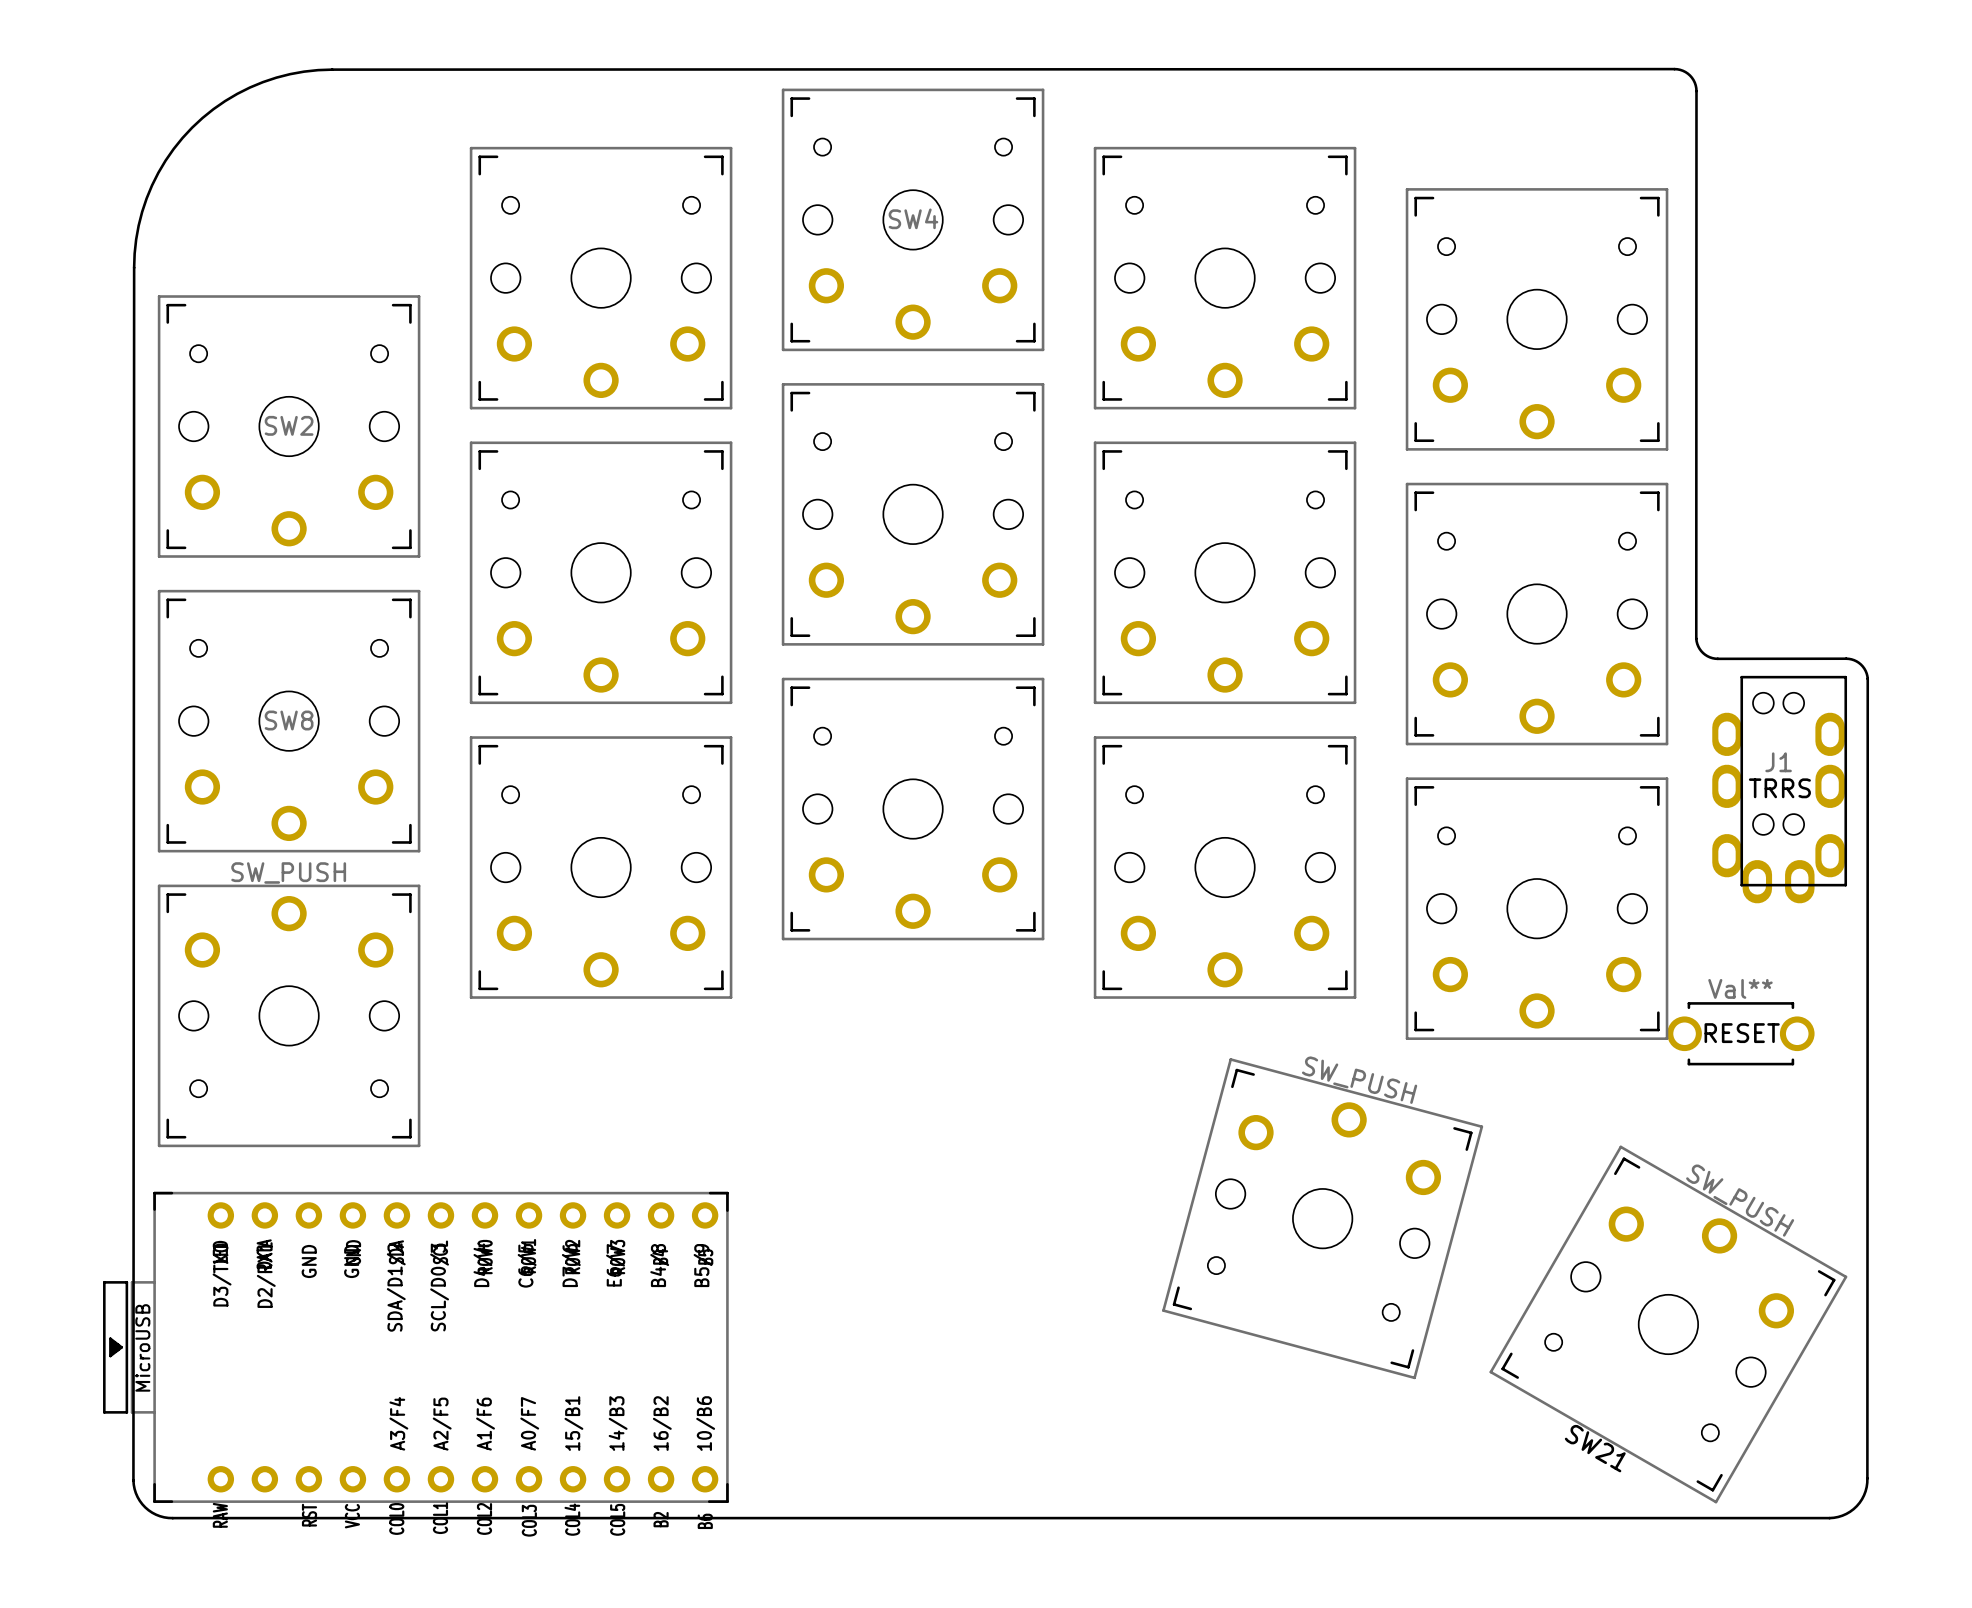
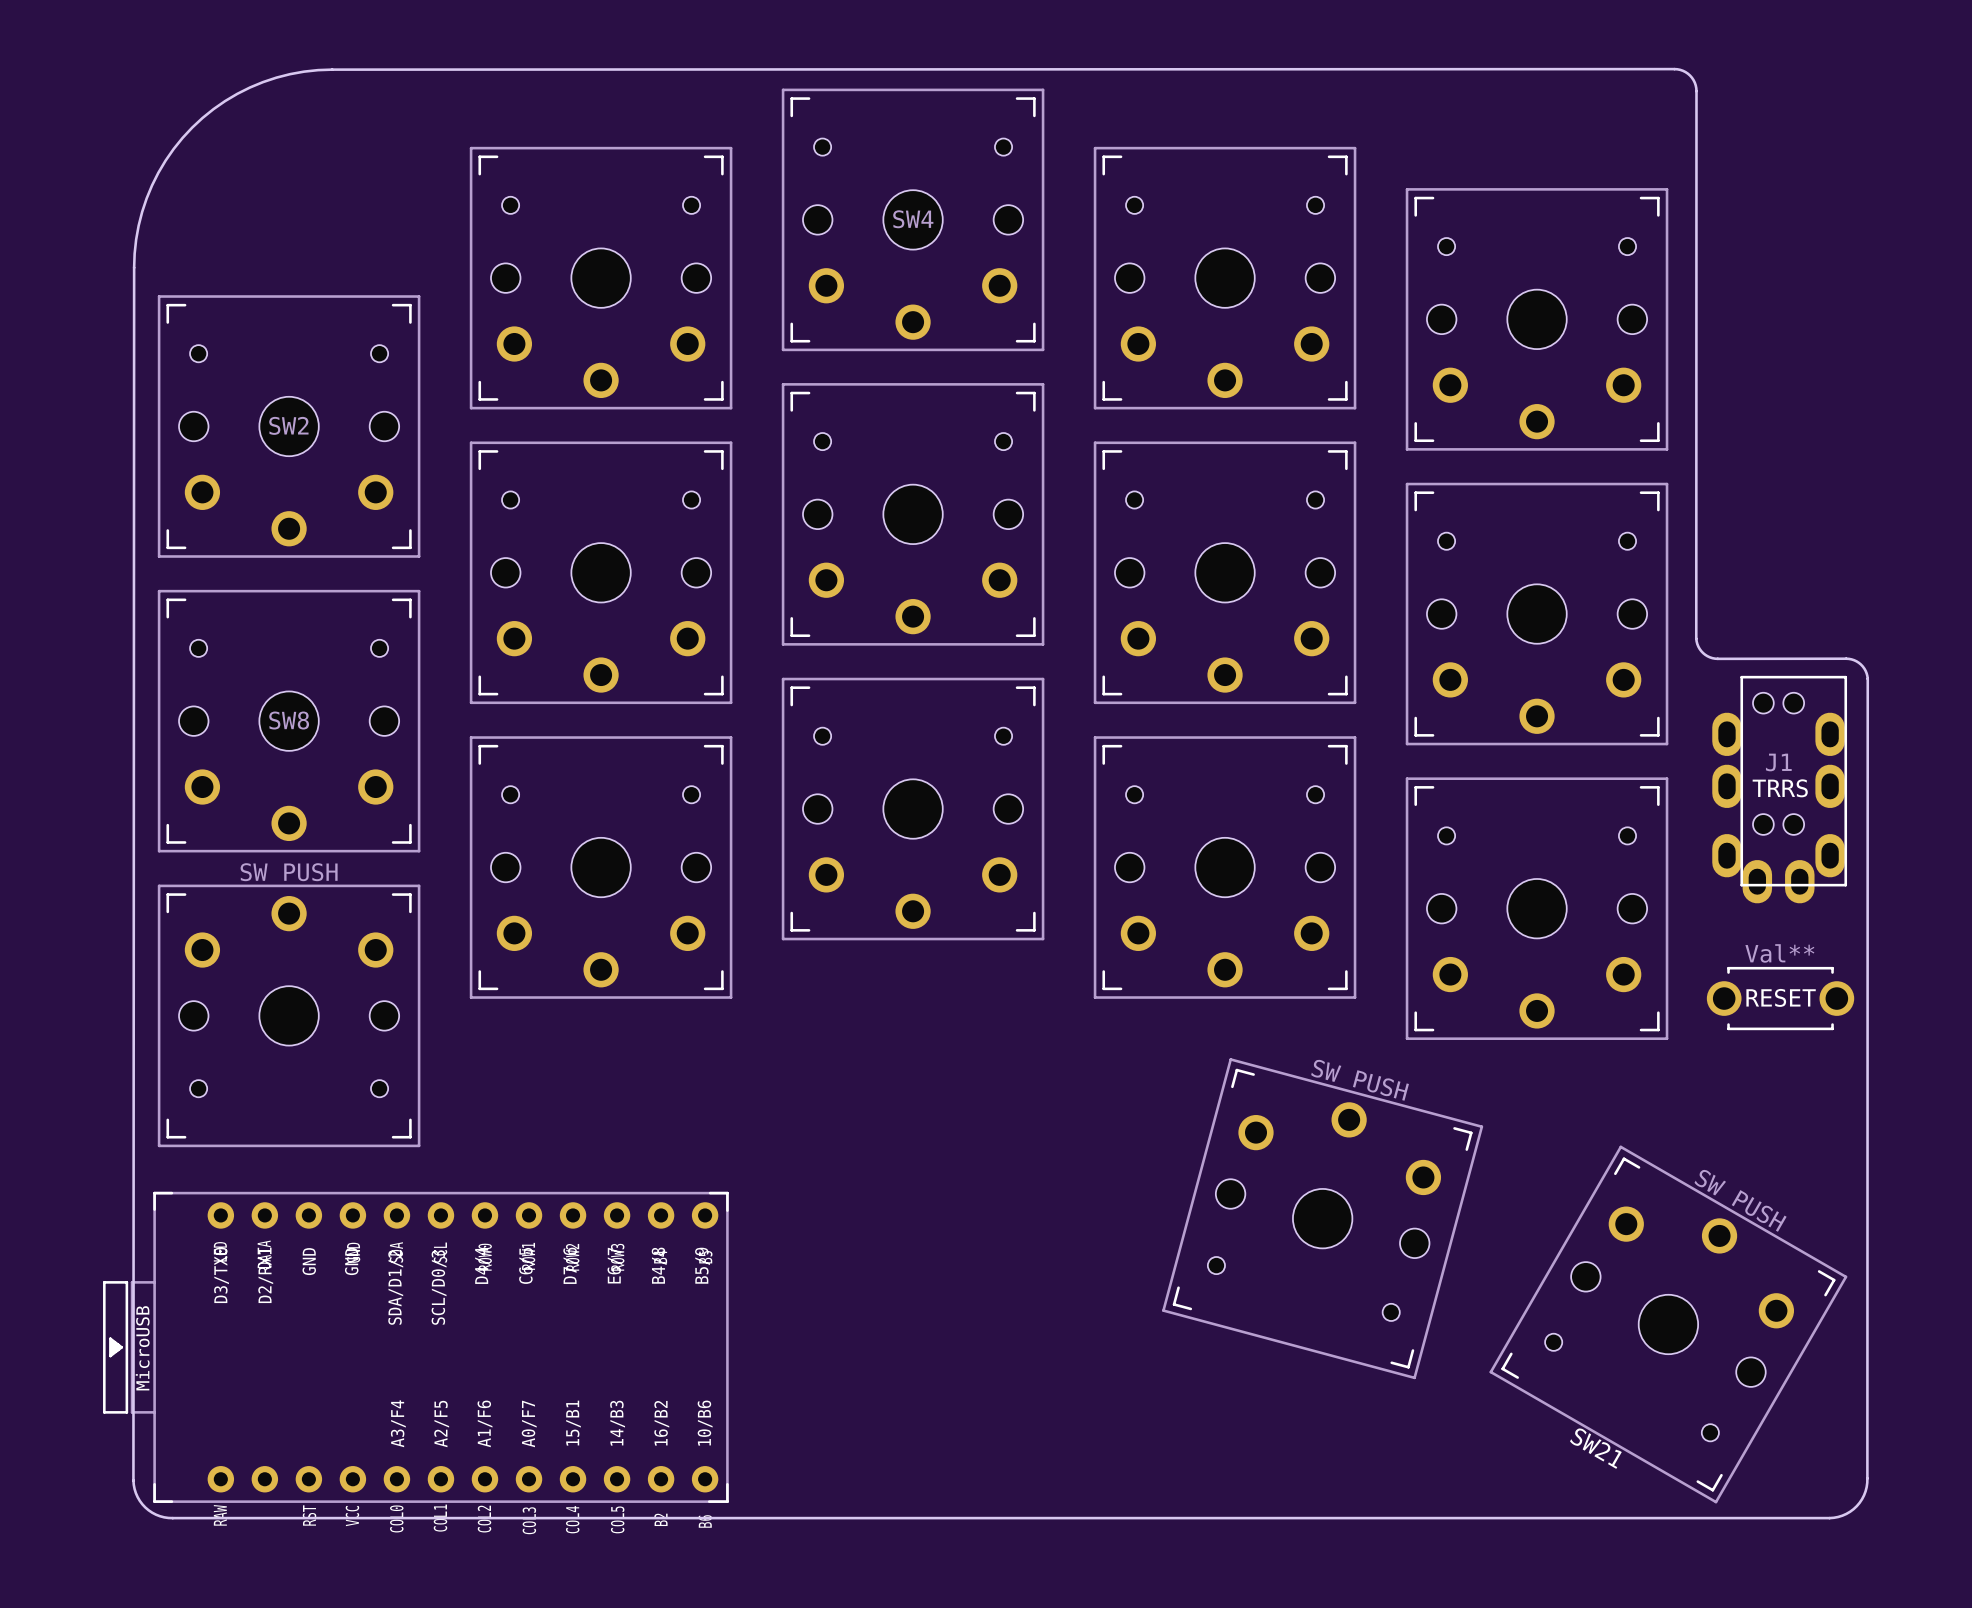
part position: (1740, 1033) -> (1780, 998)

